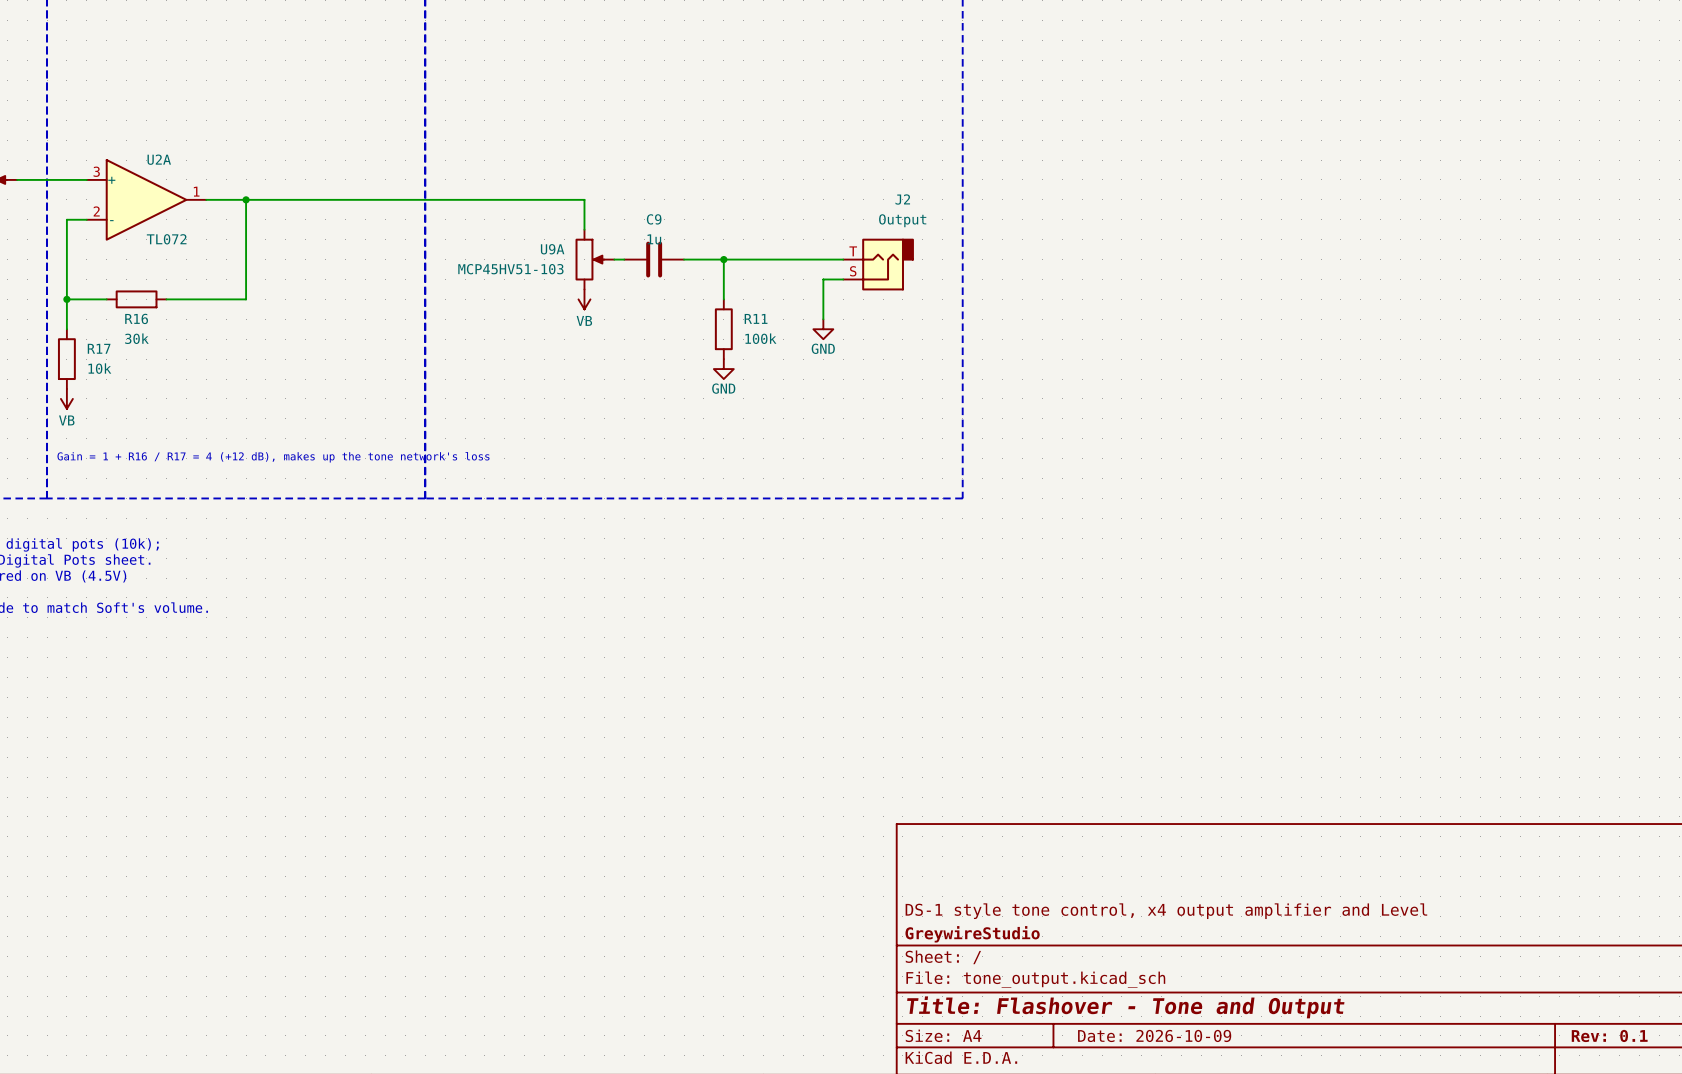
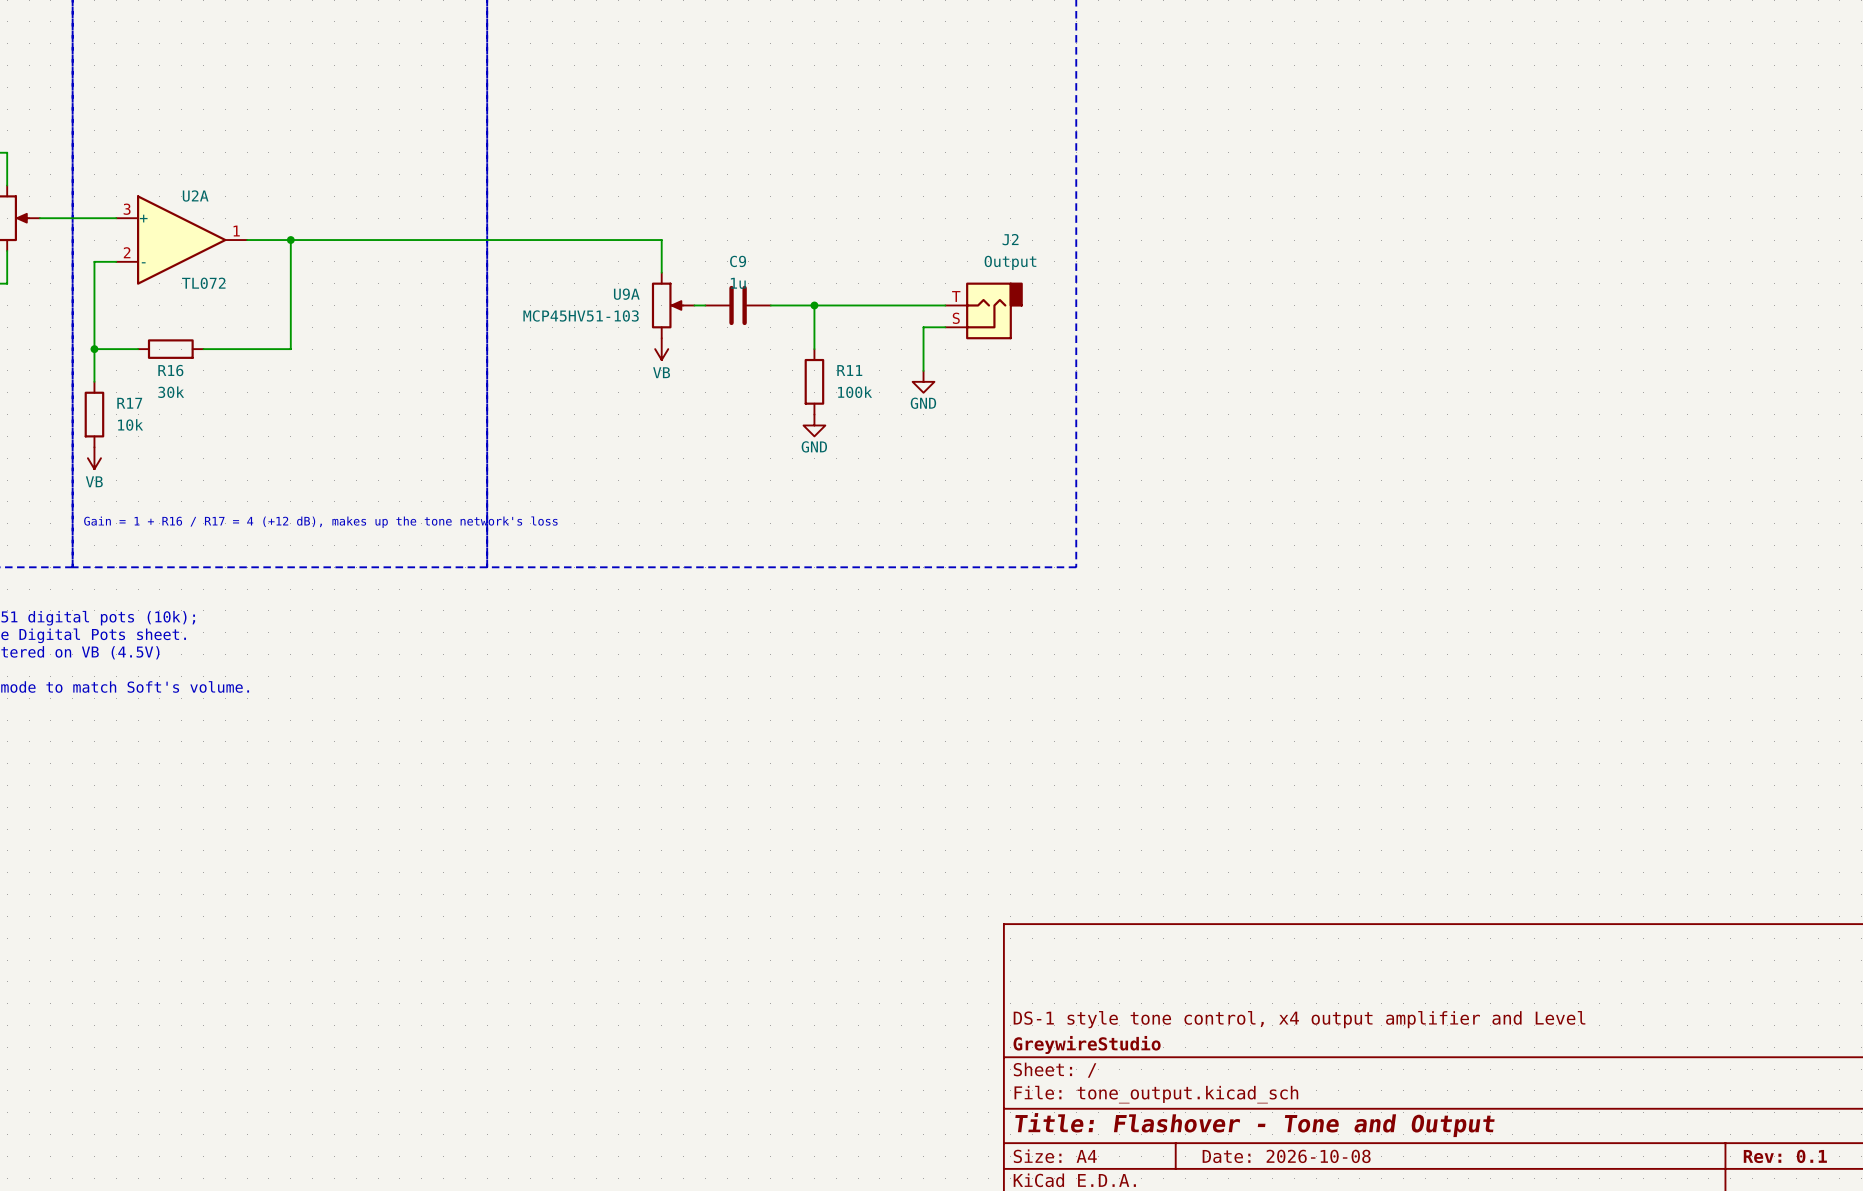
title block: Date: 2026-10-09 (1154, 1035) -> Date: 2026-10-08 (1286, 1156)

